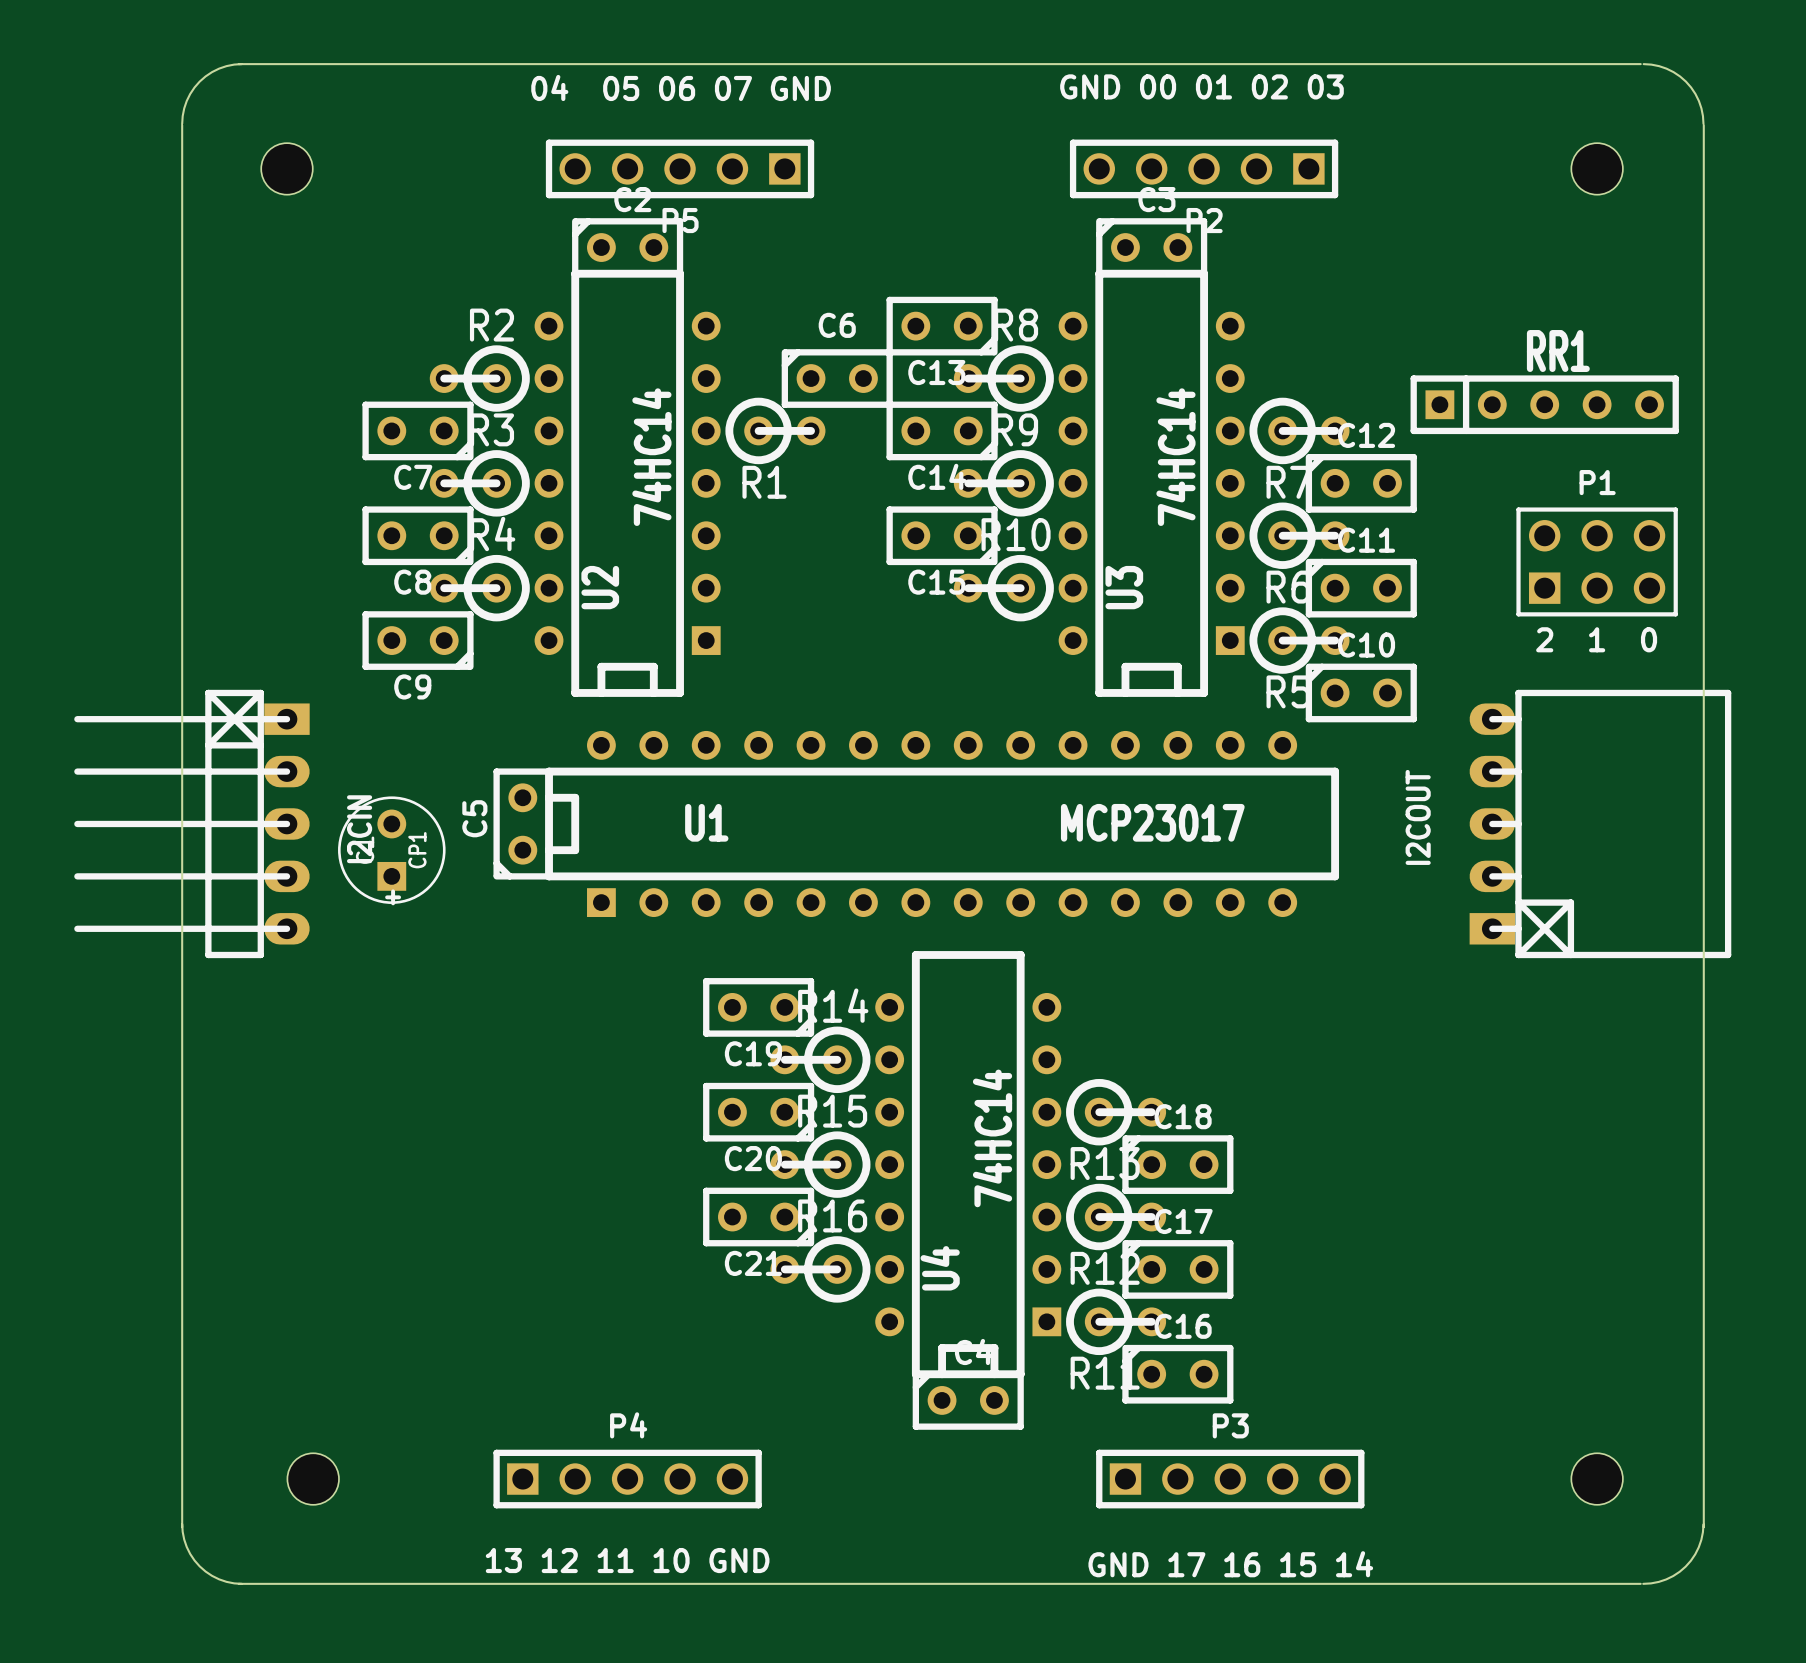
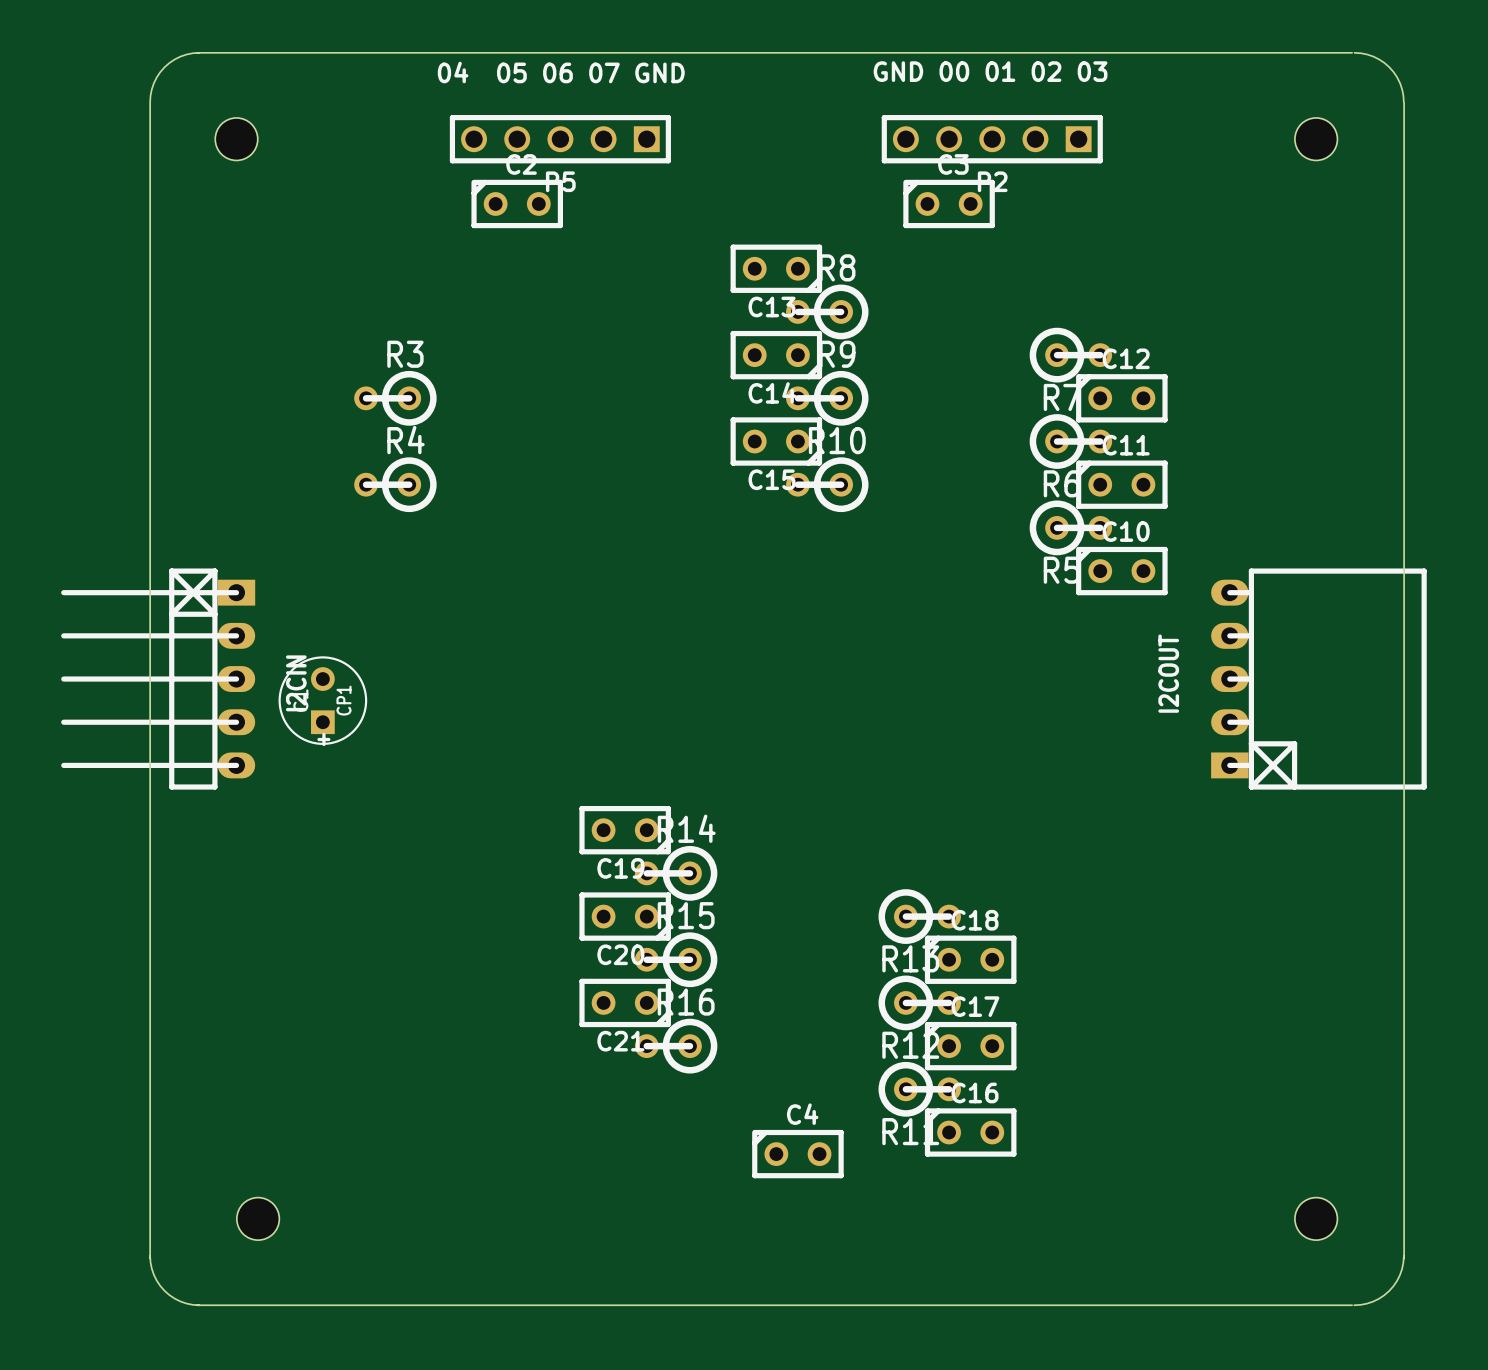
R2: (479, 378) -> none
C6: (837, 378) -> none
RR1: (1544, 404) -> none
C7: (418, 430) -> none
R1: (775, 430) -> none
U2: 74HC14 (627, 483) -> none
U3: 74HC14 (1151, 483) -> none
C8: (418, 535) -> none
P1: 2 1 0 (1597, 561) -> none
C9: (418, 640) -> none
C5: (522, 823) -> none
U1: MCP23017 (942, 823) -> none
U4: 74HC14 (968, 1164) -> none
P4: 13 12 11 10 GND (627, 1479) -> none
P3: GND 17 16 15 14 (1230, 1479) -> none

